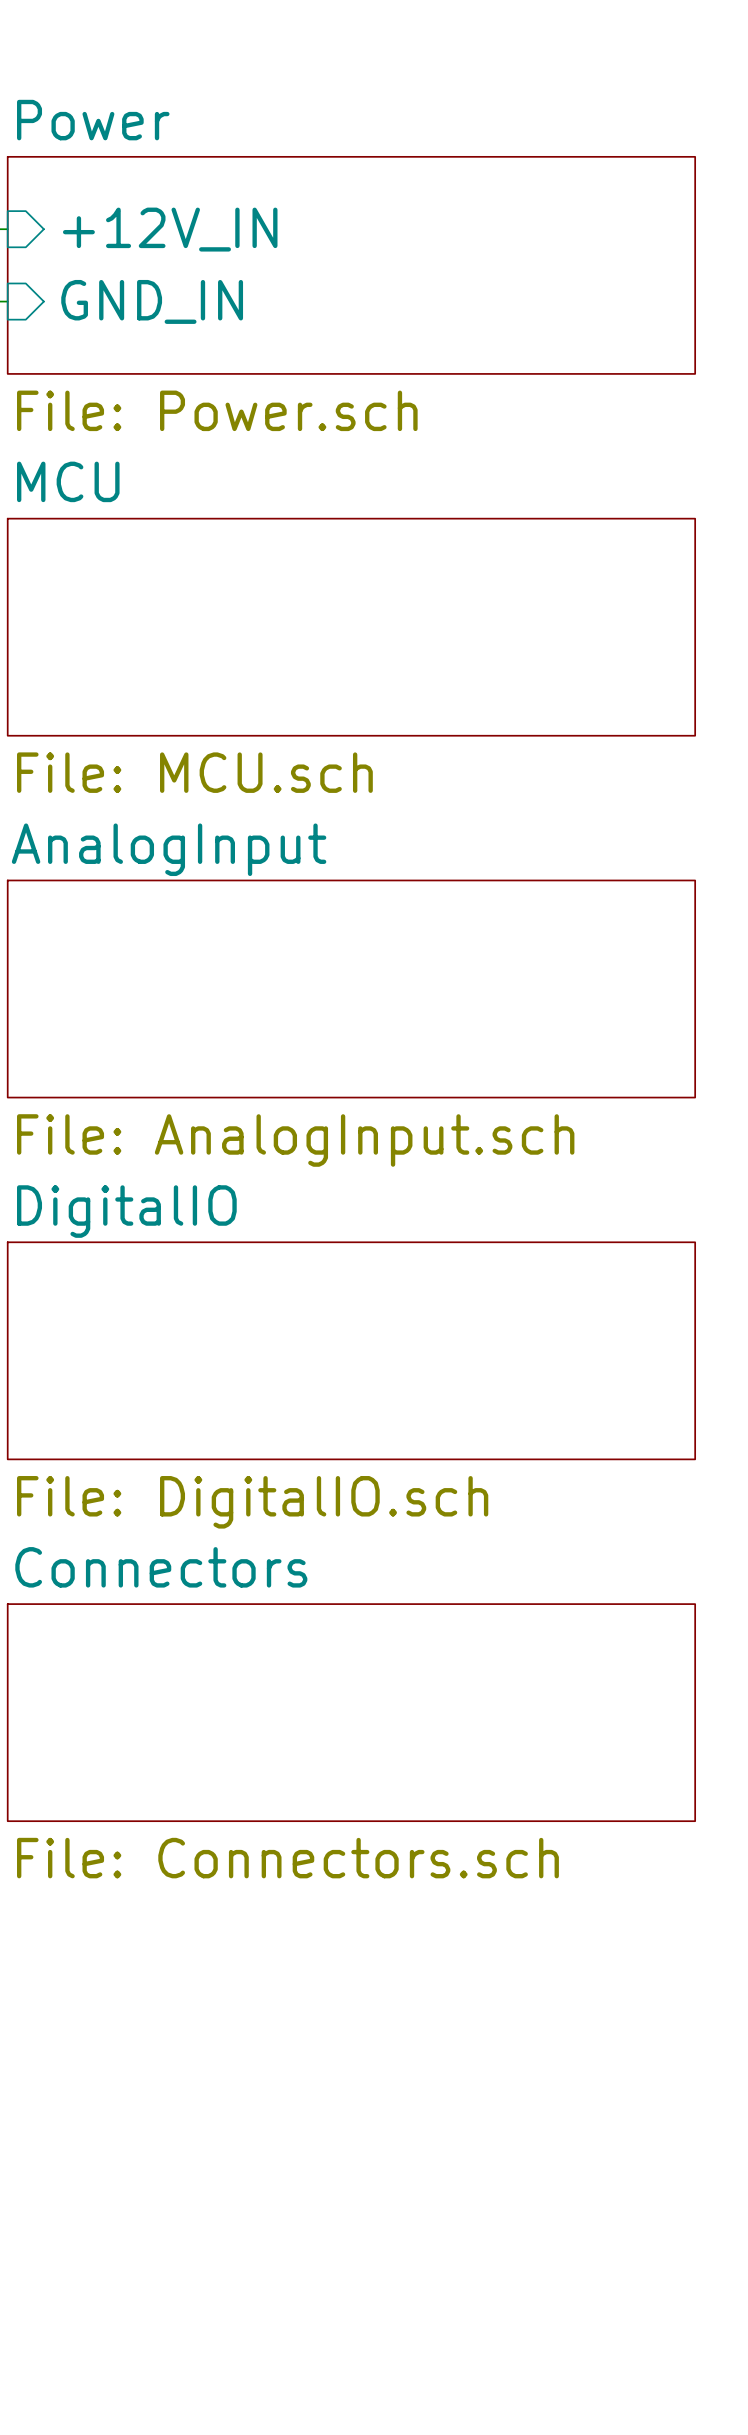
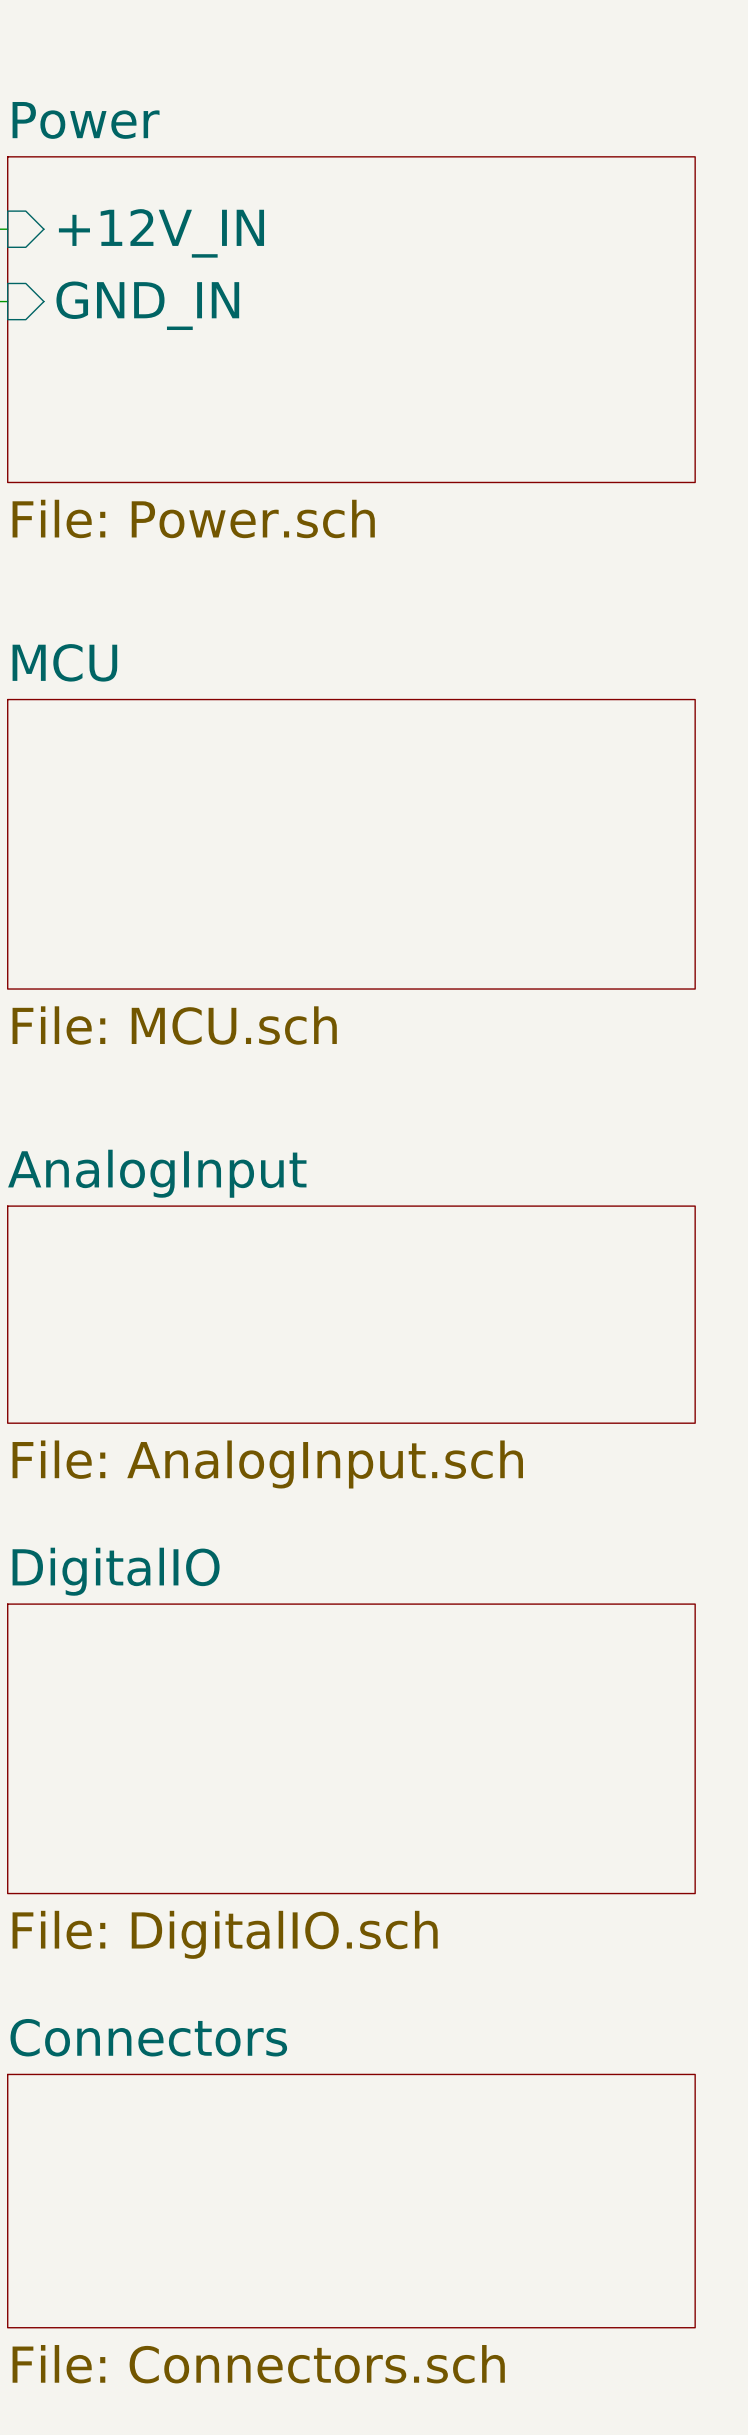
sheet Power: File: Power.sch (351, 265) -> none
sheet Power: none -> File: Power.sch (351, 319)
sheet MCU: File: MCU.sch (351, 627) -> none
sheet MCU: none -> File: MCU.sch (351, 844)
sheet AnalogInput position: (351, 989) -> (351, 1314)
sheet DigitalIO: File: DigitalIO.sch (351, 1350) -> none
sheet Connectors: File: Connectors.sch (351, 1712) -> none
sheet DigitalIO: none -> File: DigitalIO.sch (351, 1748)
sheet Connectors: none -> File: Connectors.sch (351, 2201)

